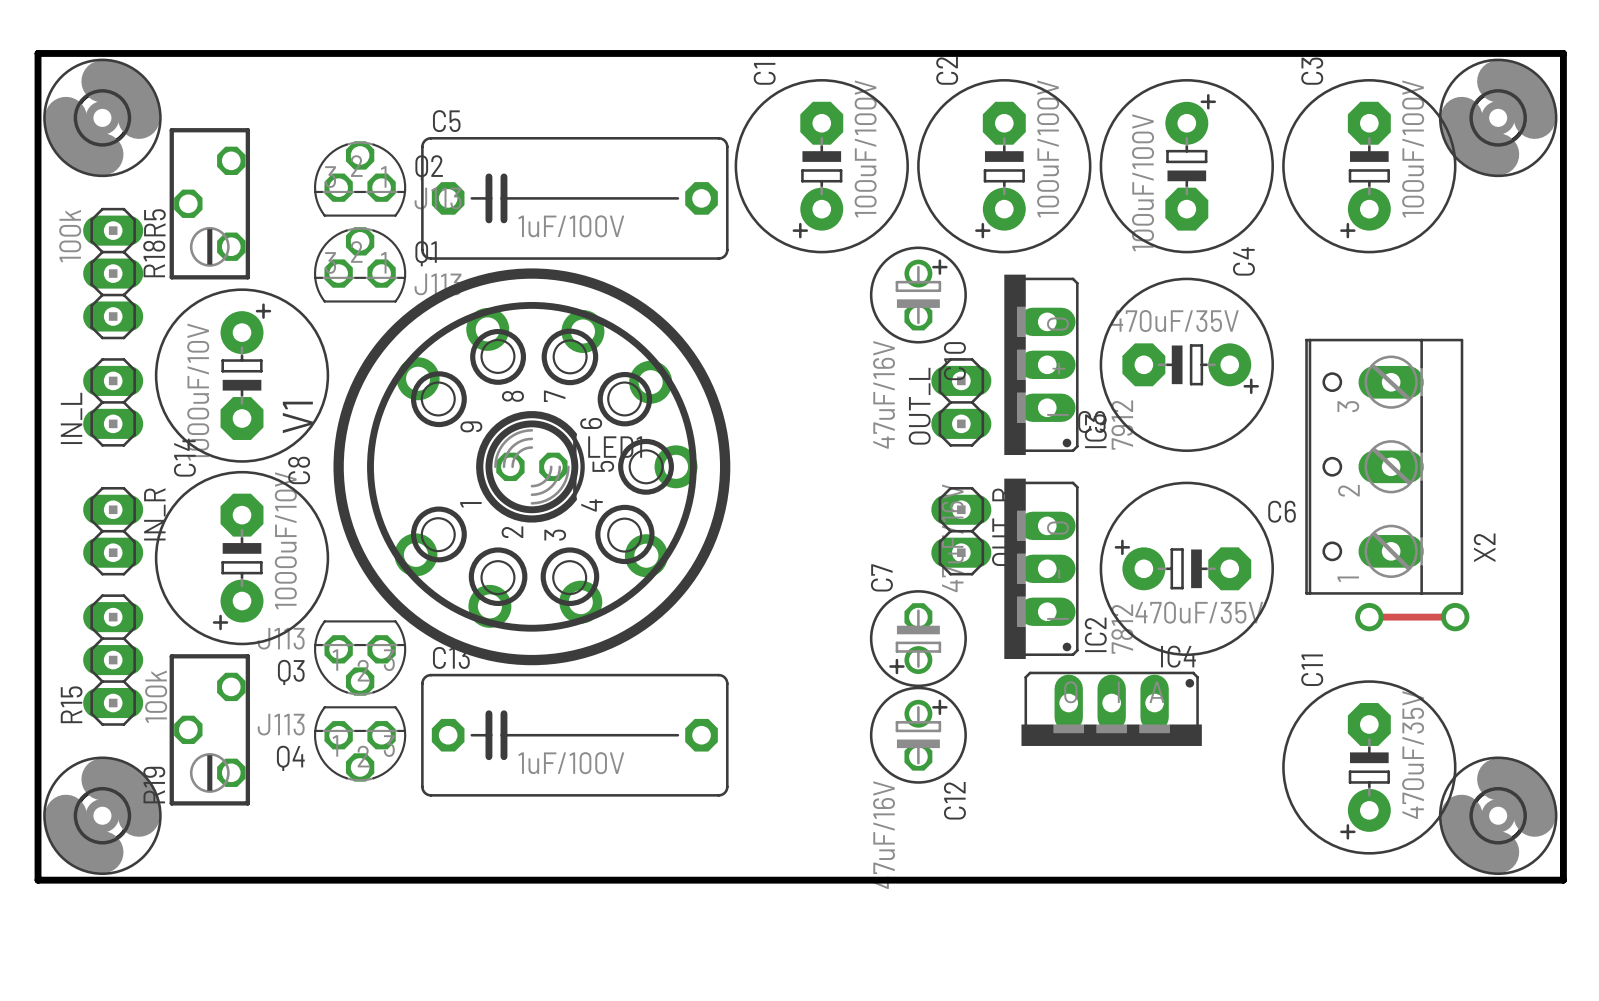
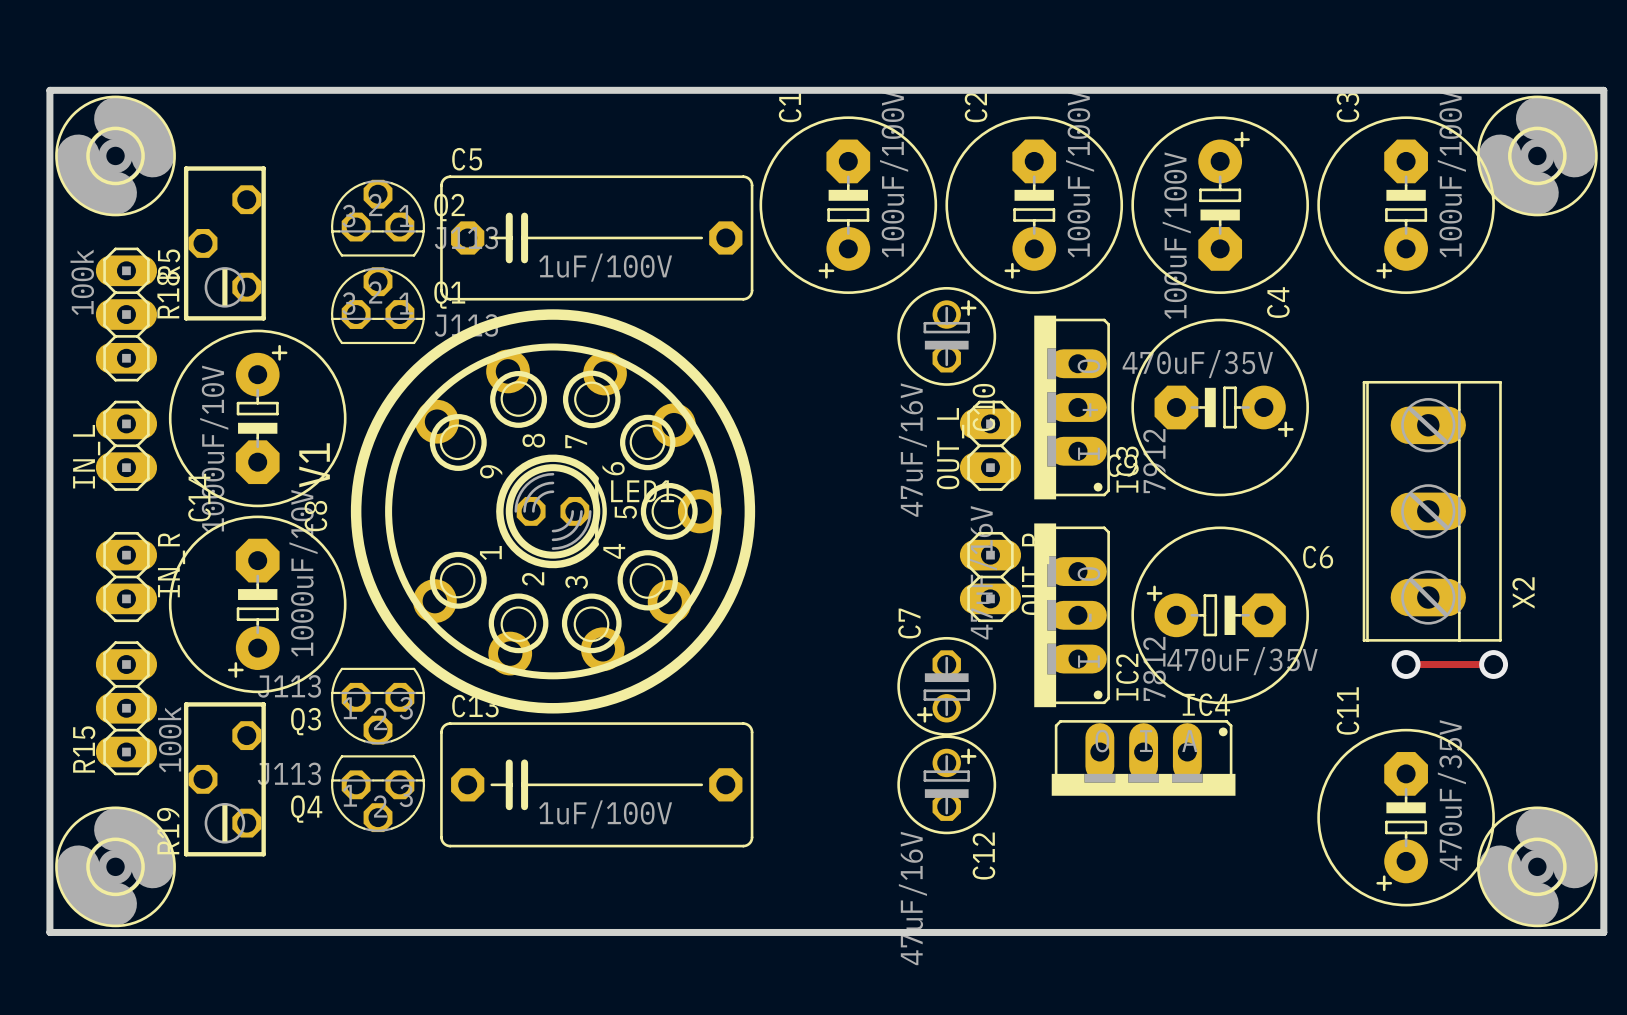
X2 footprint: [1305, 338, 1464, 595] -> [1362, 380, 1502, 642]

